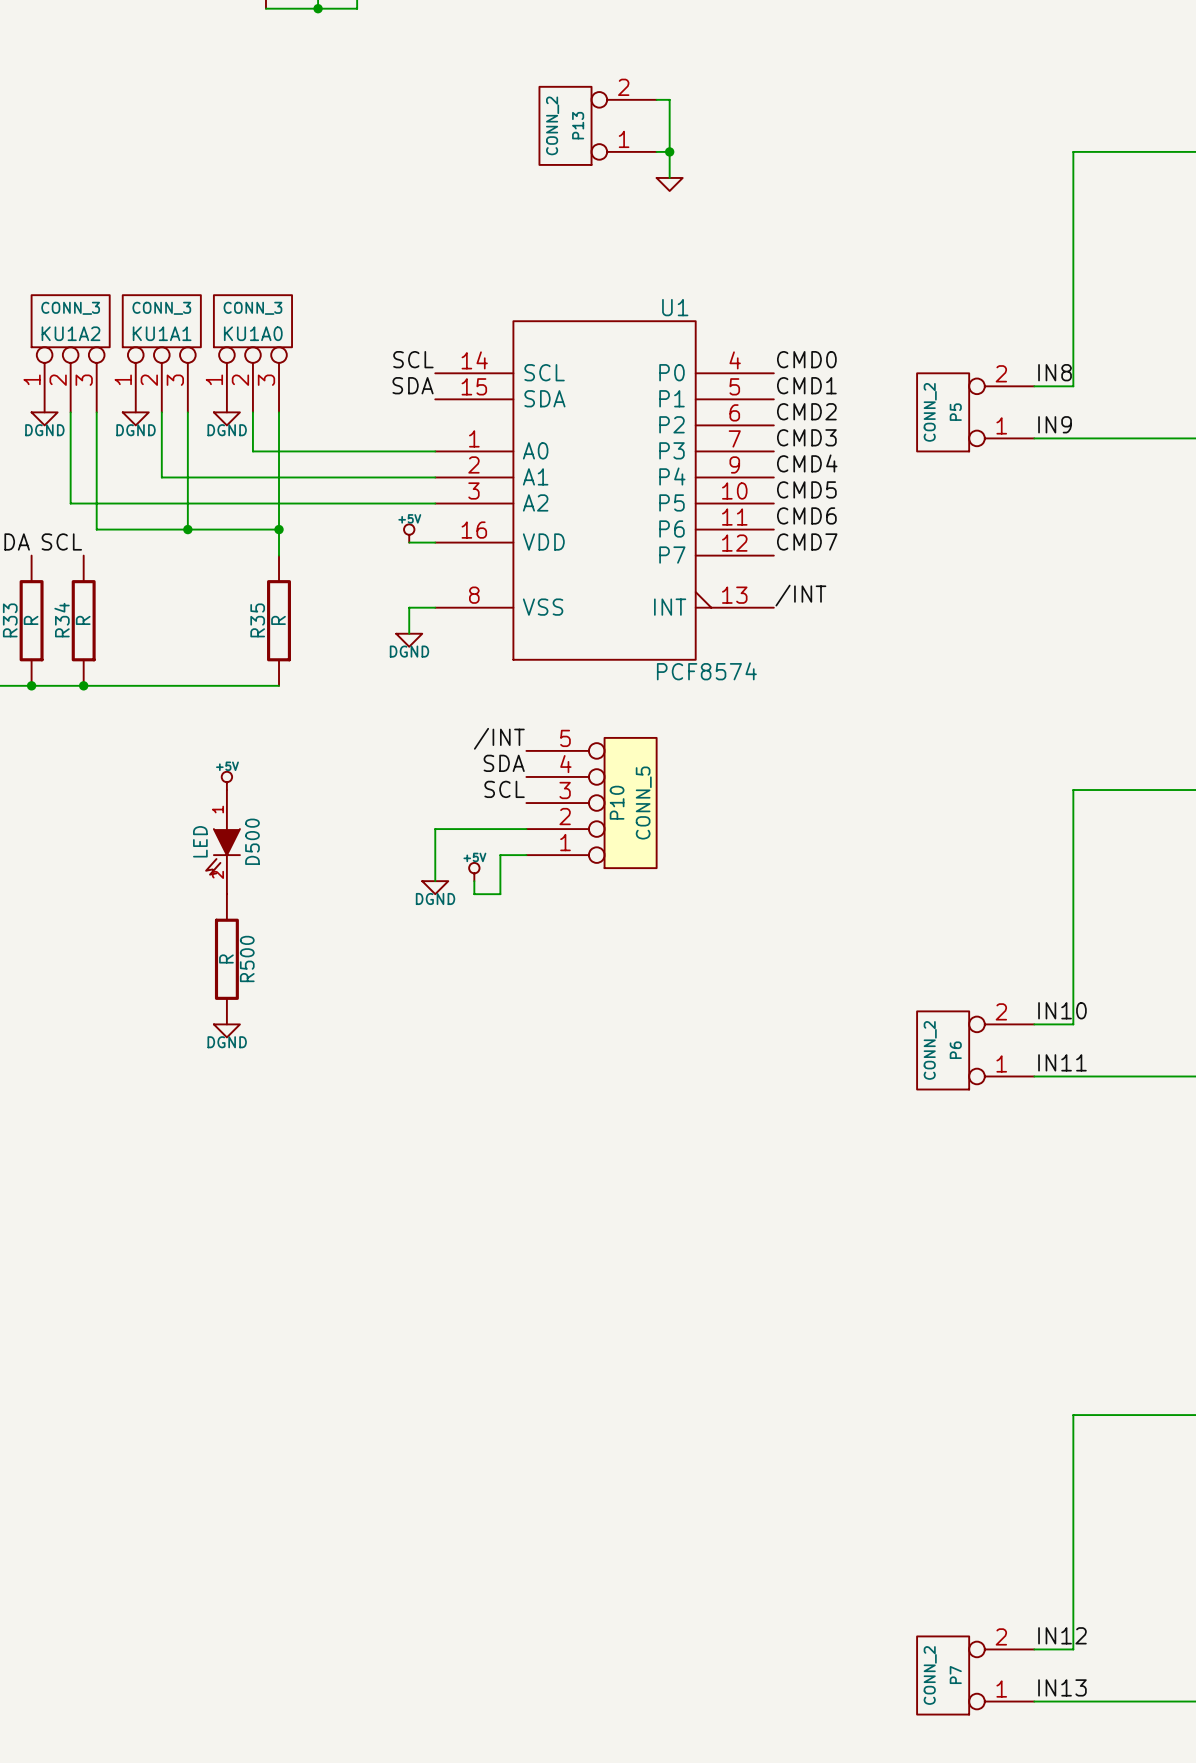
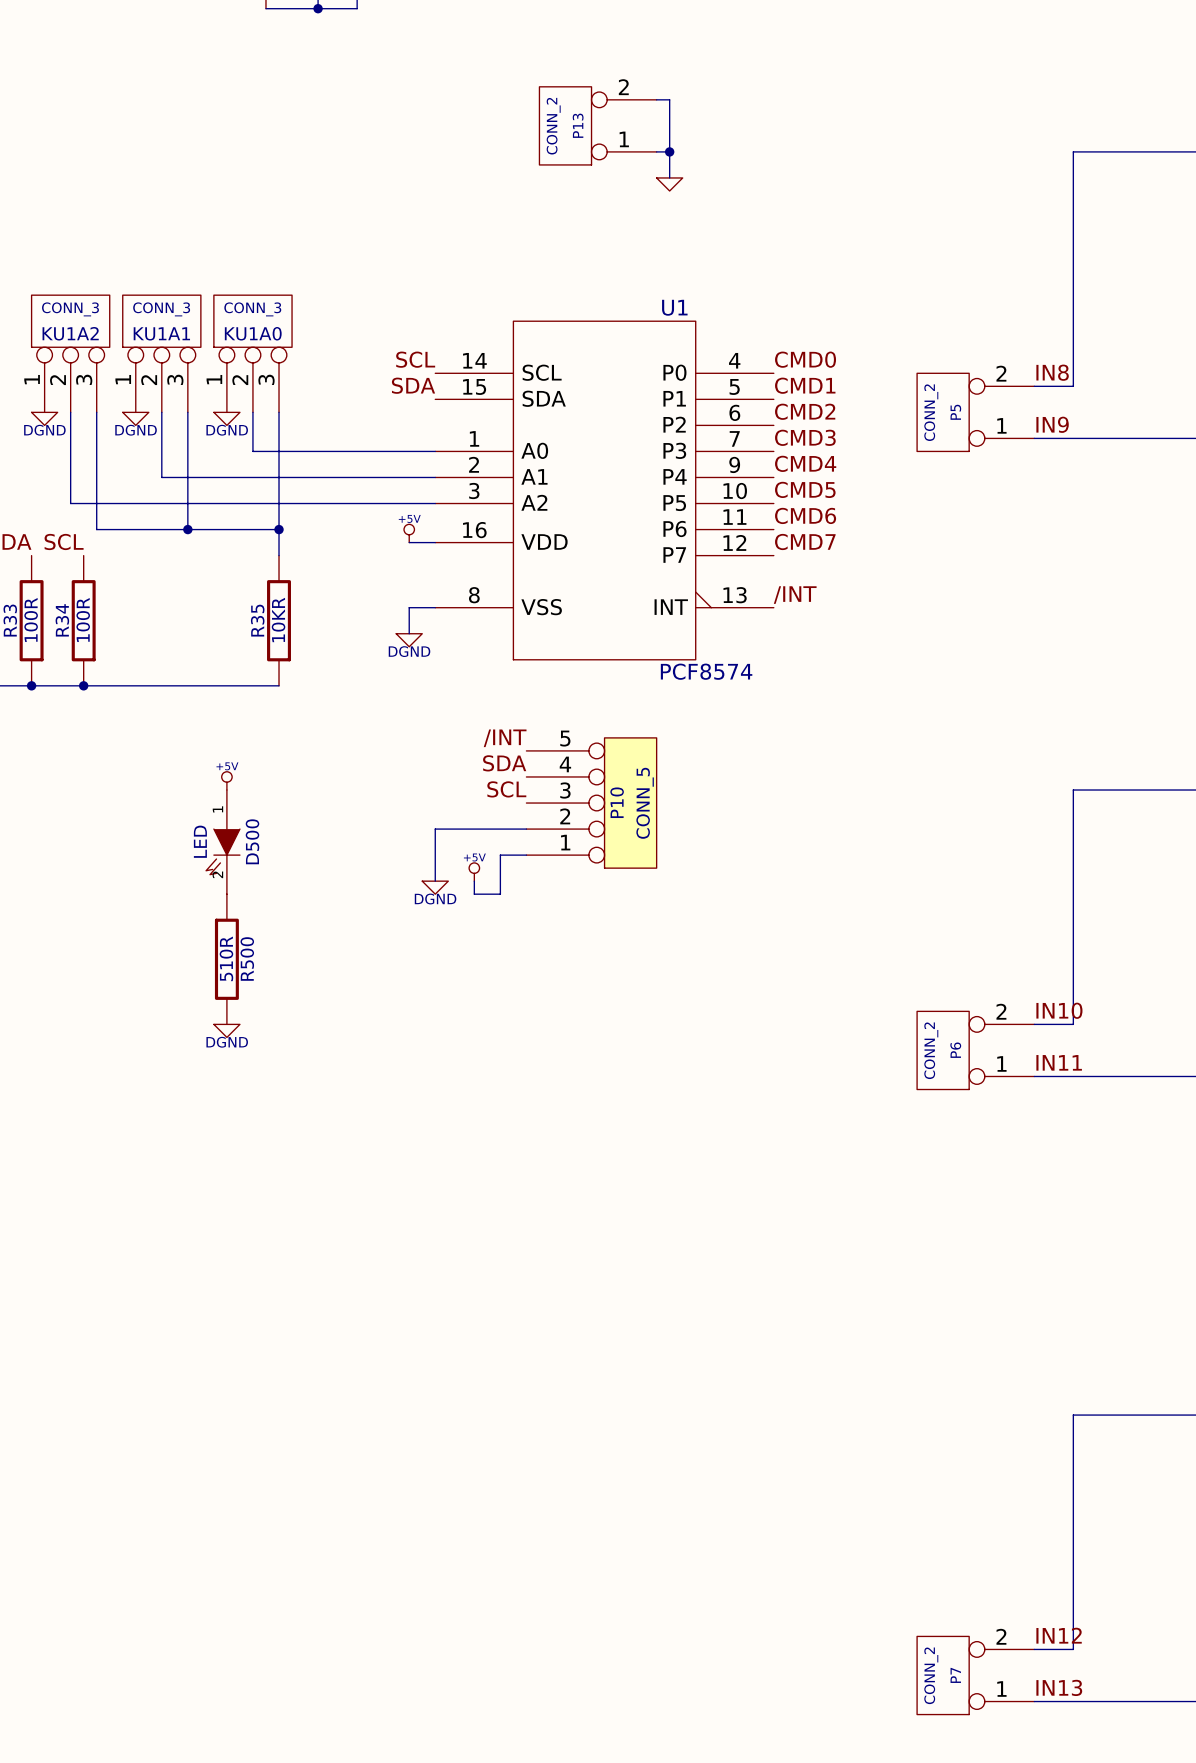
R33 value: R (31, 620) -> 100R (31, 619)
R34 value: R (83, 620) -> 100R (83, 619)
R35 value: R (278, 620) -> 10KR (278, 619)
R500 value: R (226, 958) -> 510R (226, 958)

